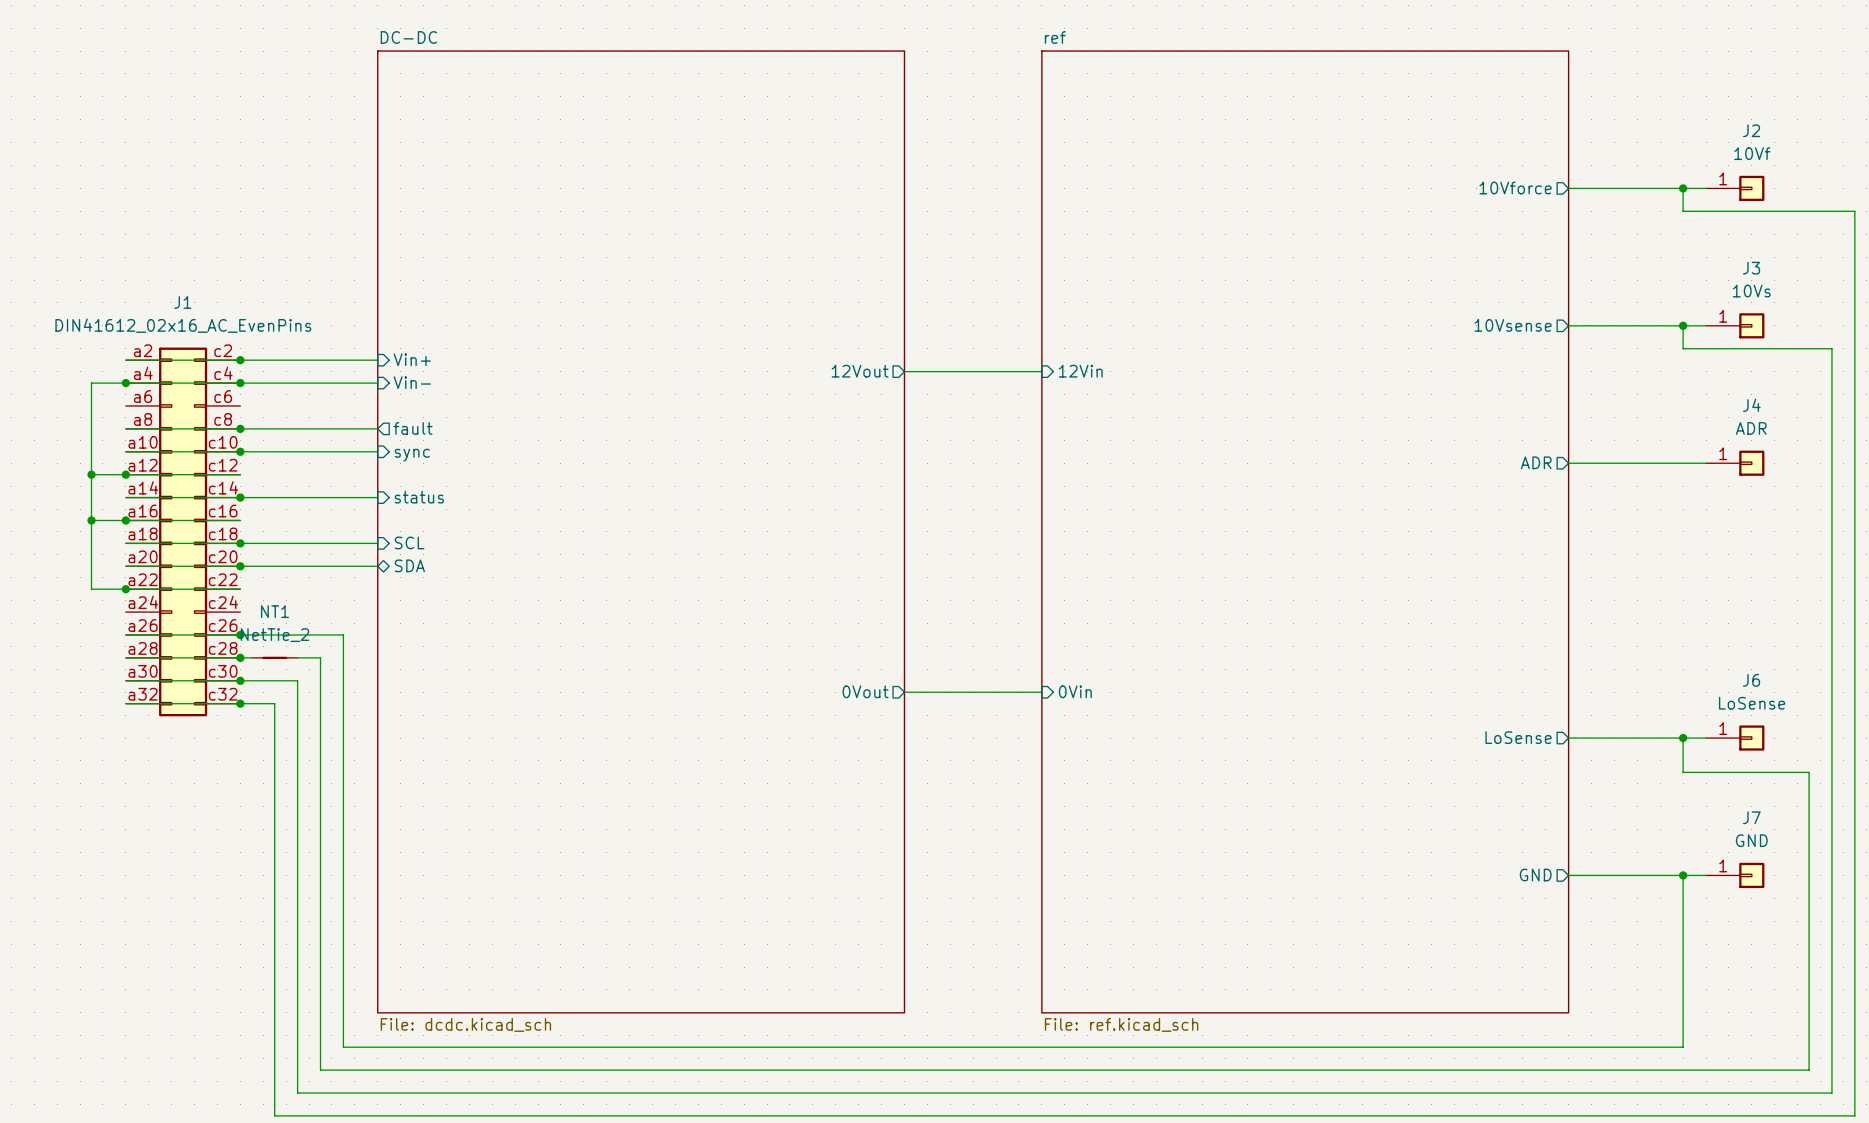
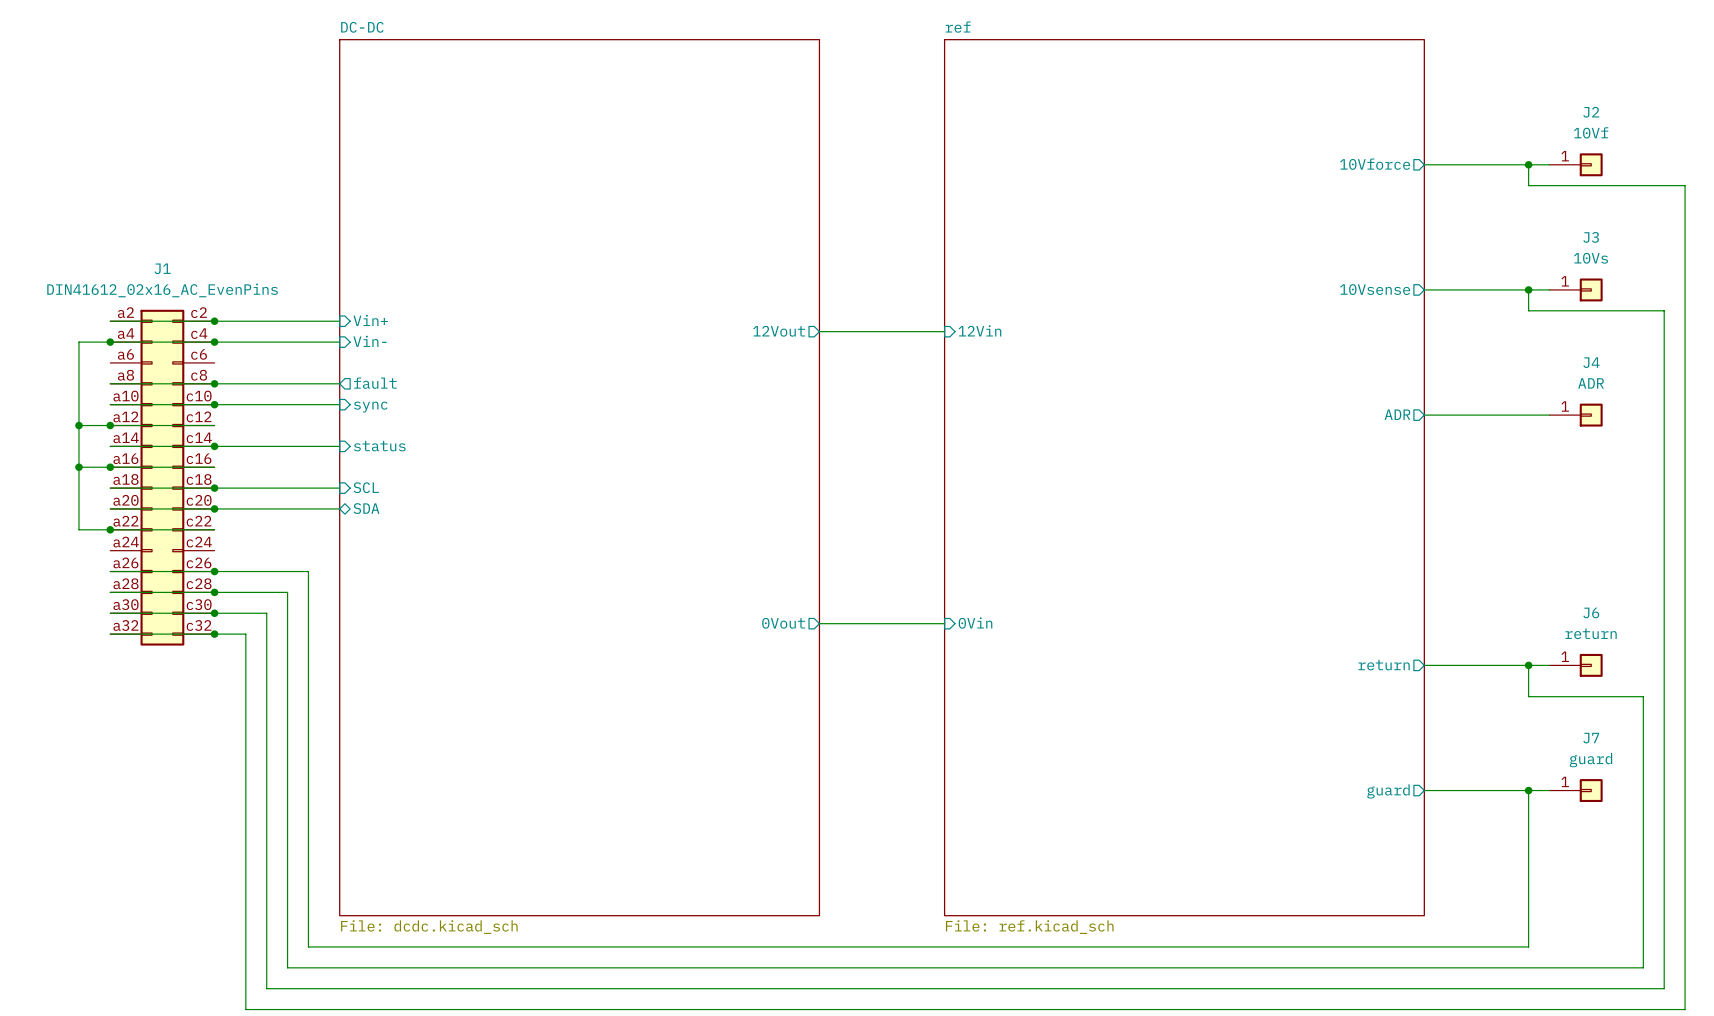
NT1: NetTie_2 (274, 657) -> none
J6 value: LoSense (1752, 703) -> return (1591, 633)
sheet pin: LoSense (1518, 737) -> return (1384, 665)
J7 value: GND (1751, 840) -> guard (1590, 760)
sheet pin: GND (1535, 875) -> guard (1388, 791)

